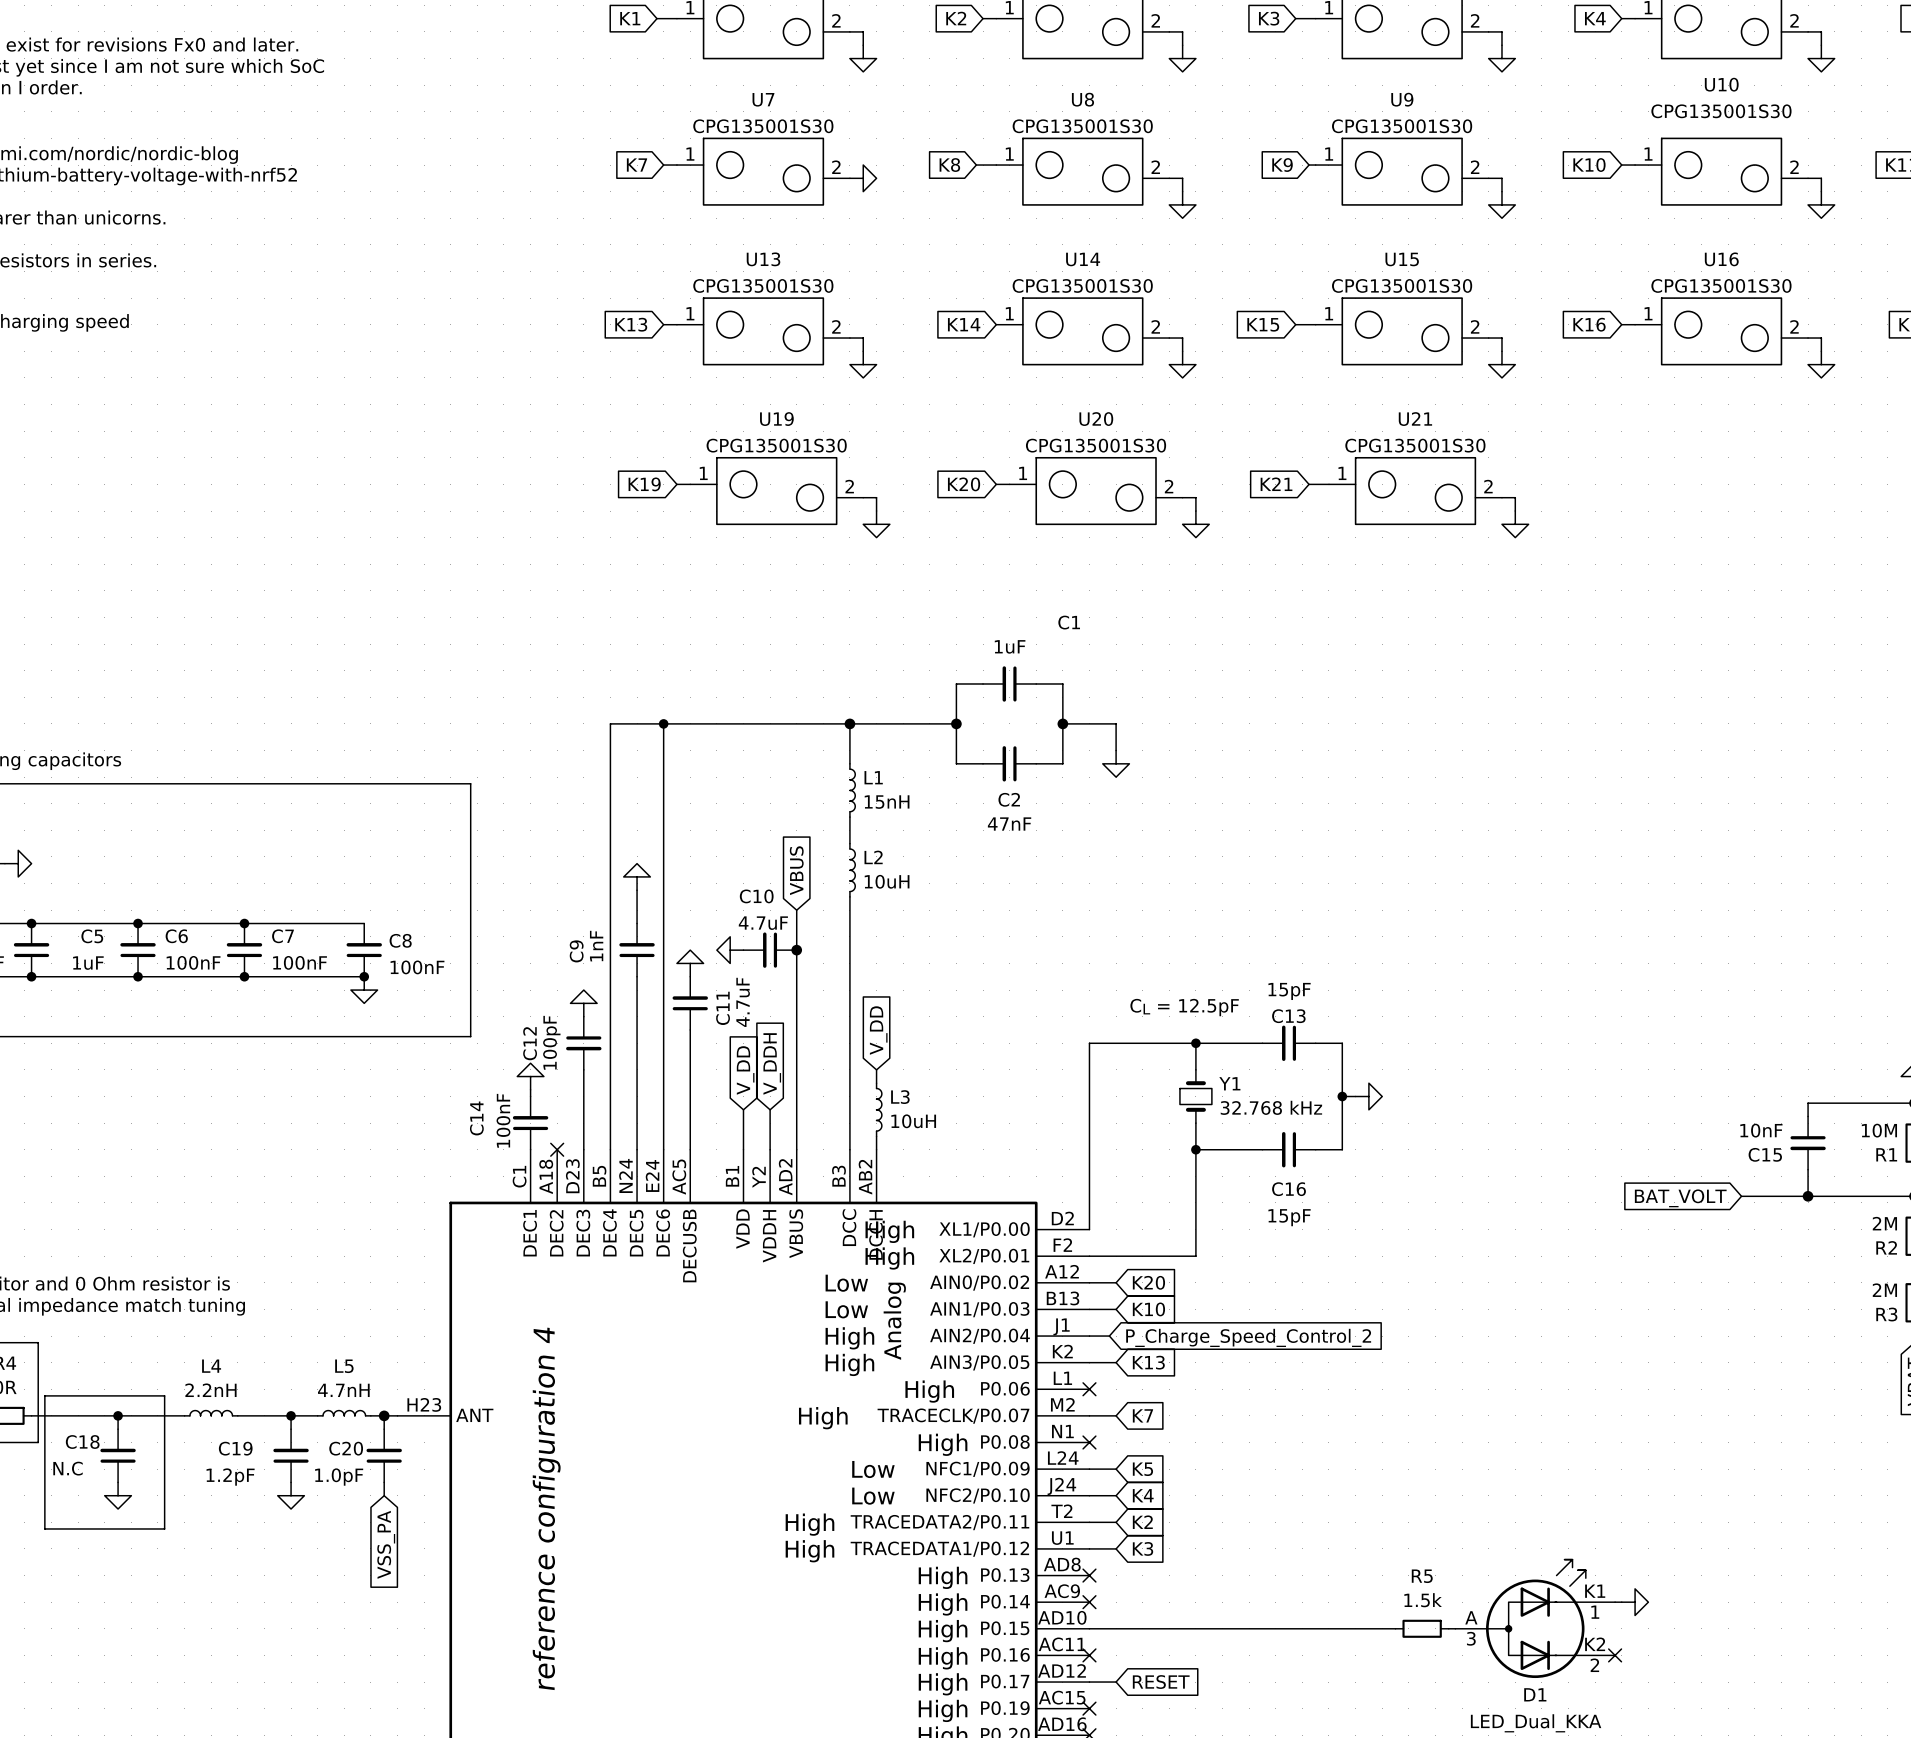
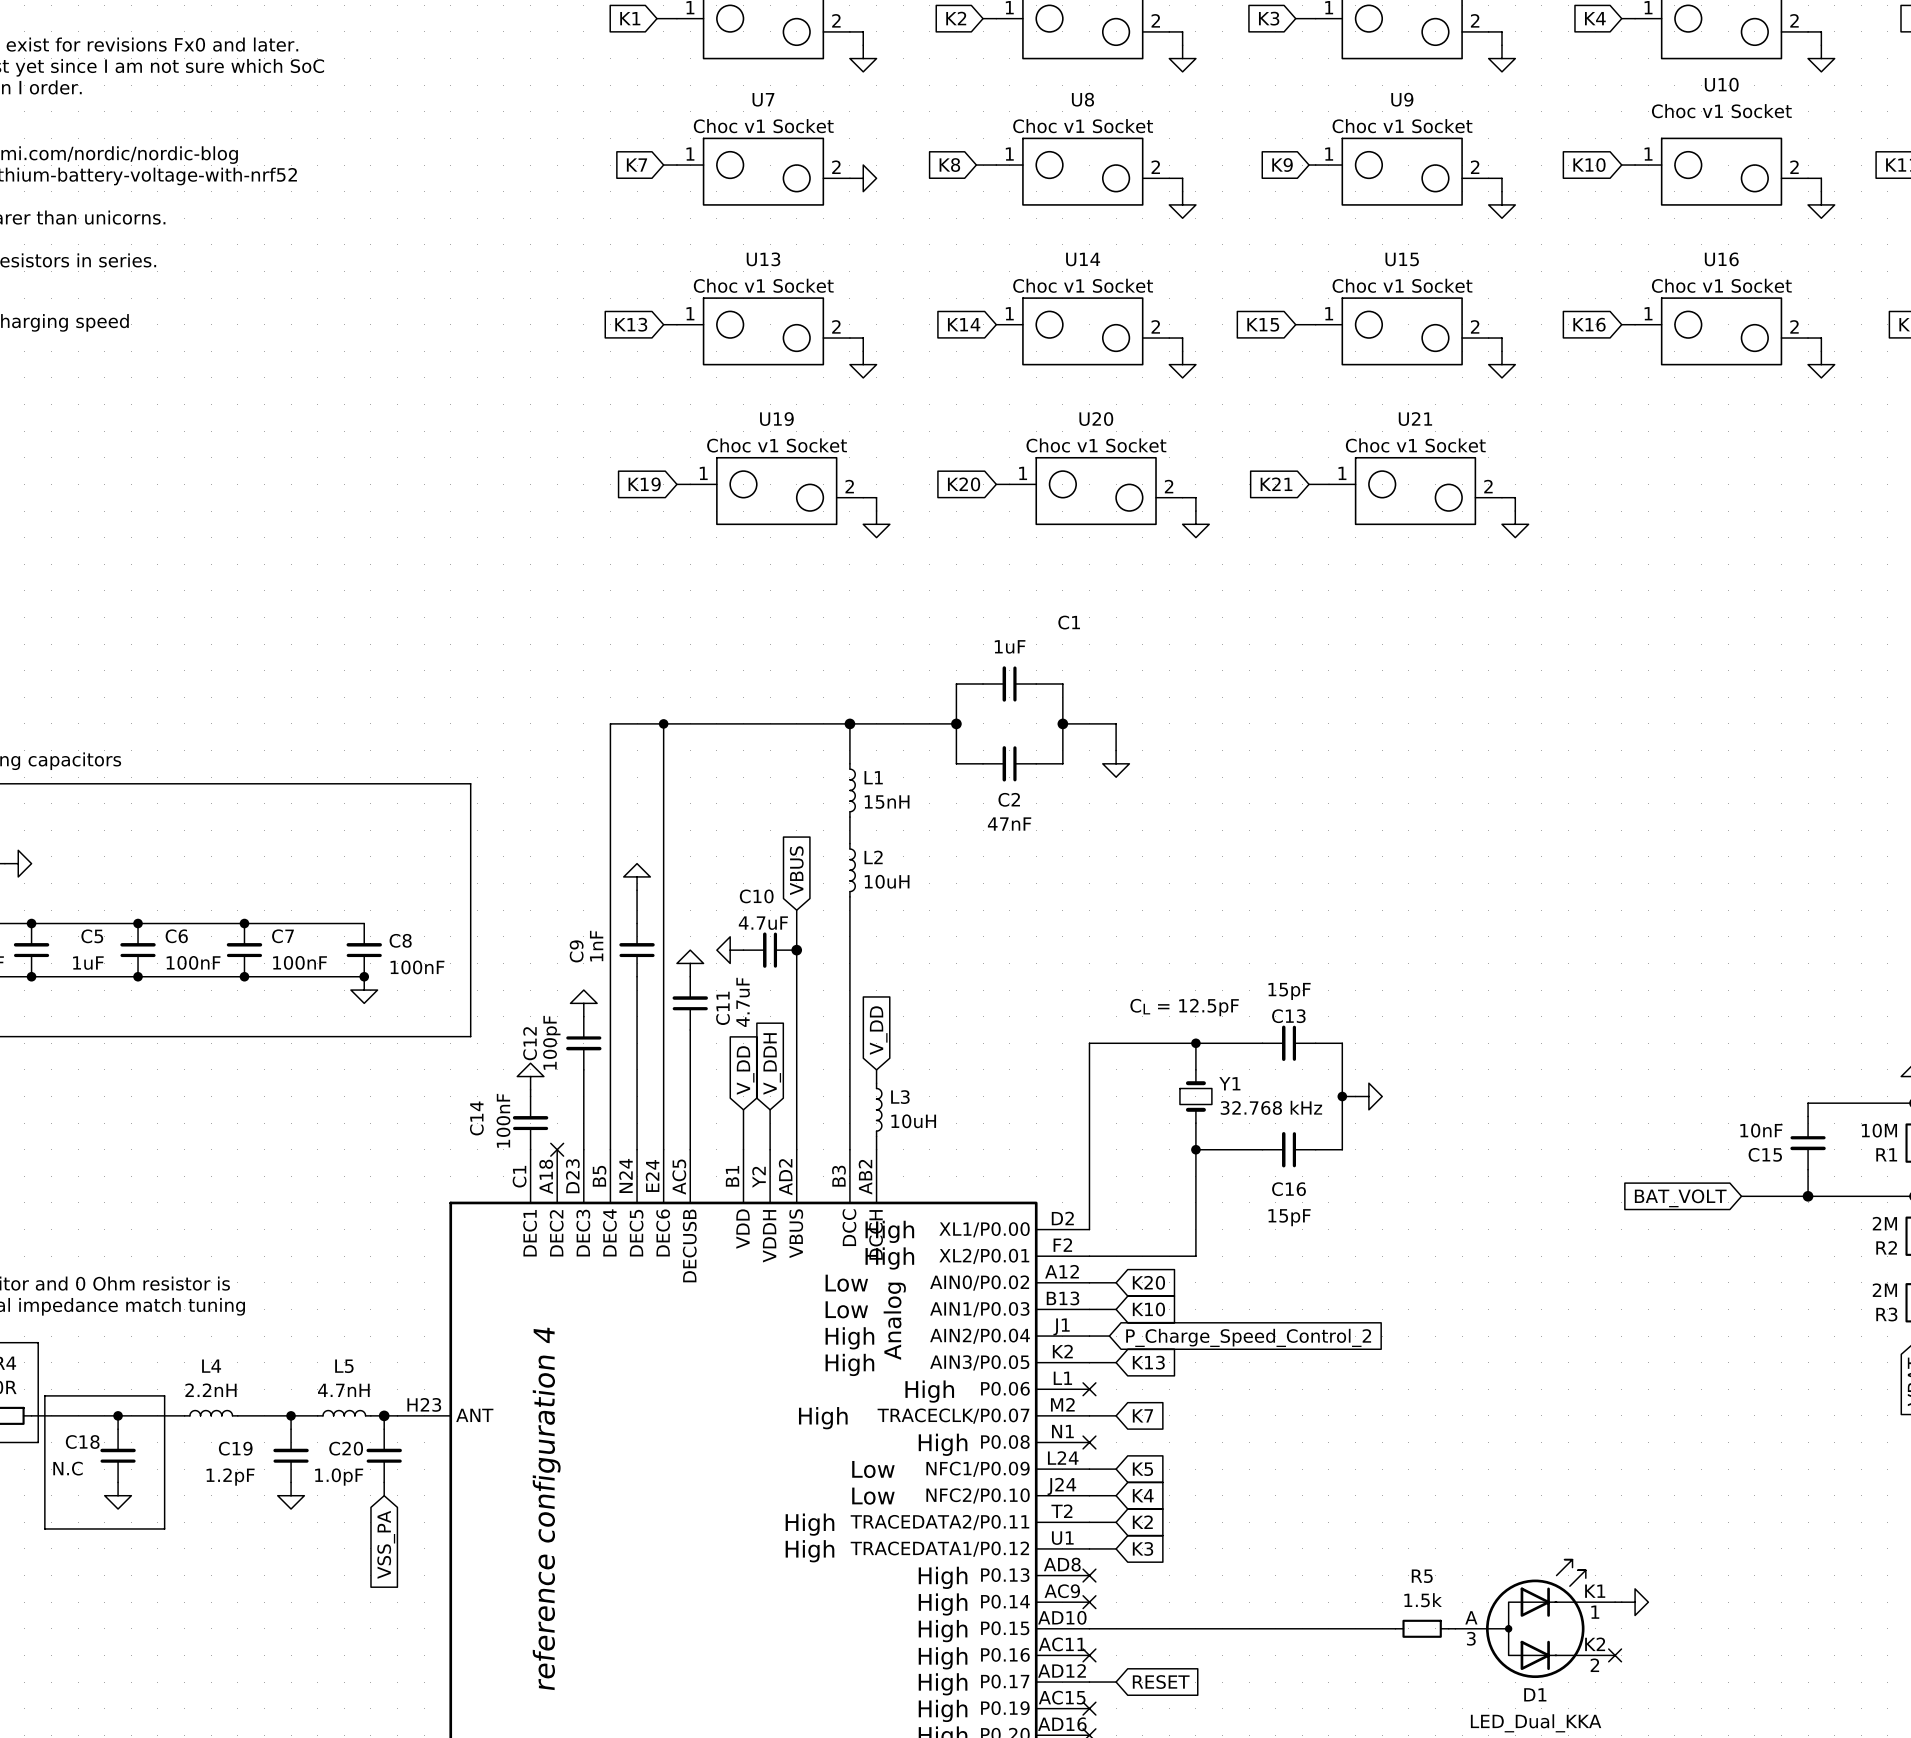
U10 value: CPG135001S30 (1721, 111) -> Choc v1 Socket (1721, 111)
U7 value: CPG135001S30 (763, 126) -> Choc v1 Socket (763, 126)
U8 value: CPG135001S30 (1082, 126) -> Choc v1 Socket (1083, 126)
U9 value: CPG135001S30 (1402, 126) -> Choc v1 Socket (1402, 126)
U13 value: CPG135001S30 (763, 285) -> Choc v1 Socket (763, 285)
U14 value: CPG135001S30 (1082, 285) -> Choc v1 Socket (1083, 285)
U15 value: CPG135001S30 (1402, 285) -> Choc v1 Socket (1402, 285)
U16 value: CPG135001S30 (1721, 285) -> Choc v1 Socket (1721, 285)
U19 value: CPG135001S30 (776, 445) -> Choc v1 Socket (777, 445)
U20 value: CPG135001S30 (1096, 445) -> Choc v1 Socket (1096, 445)
U21 value: CPG135001S30 (1415, 445) -> Choc v1 Socket (1415, 445)

